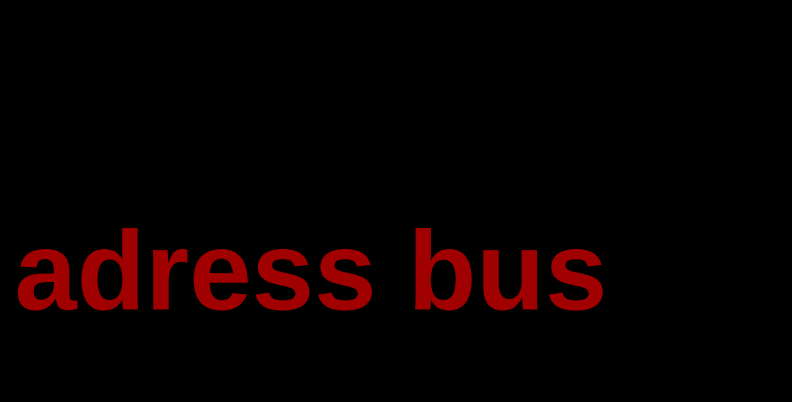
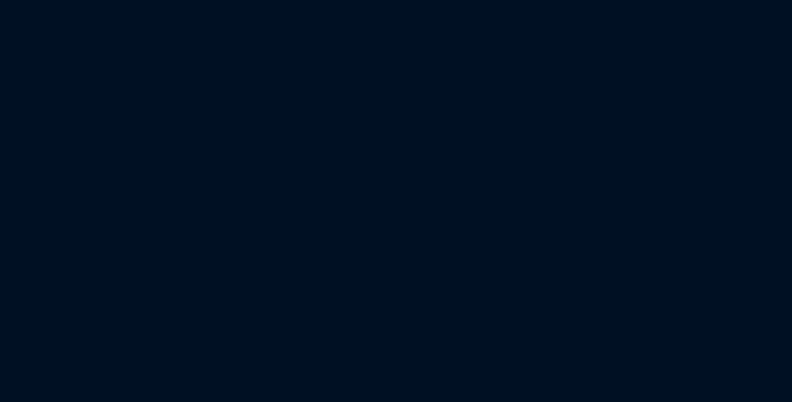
text: adress bus (310, 269) -> none

